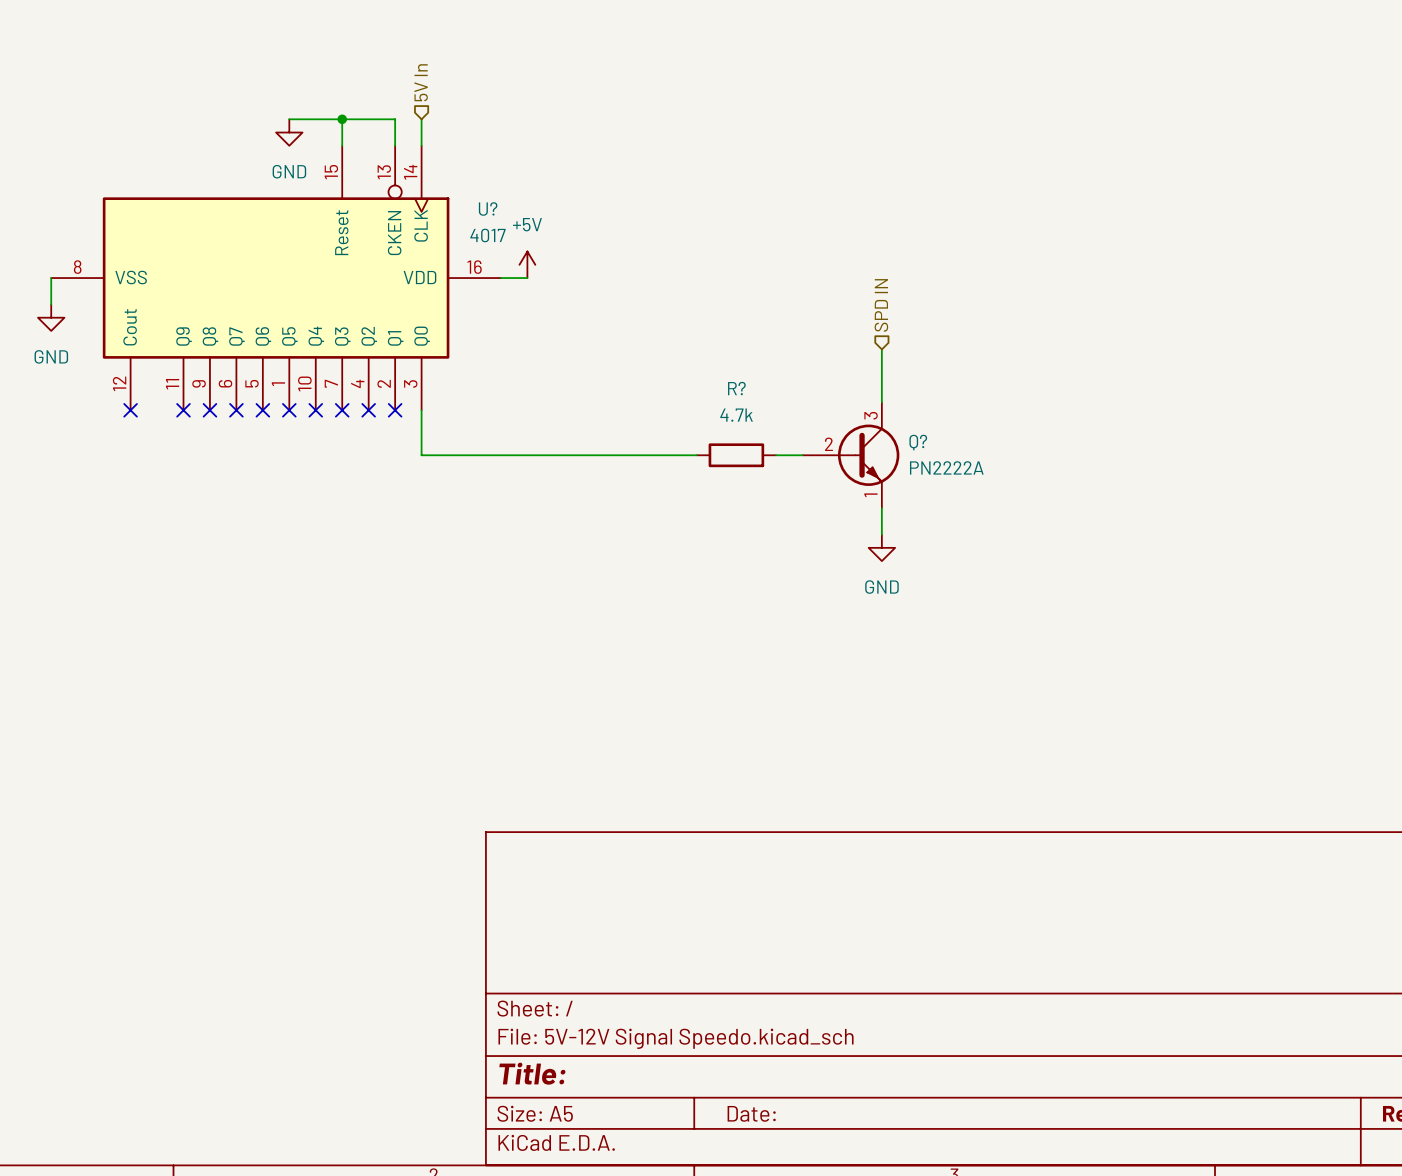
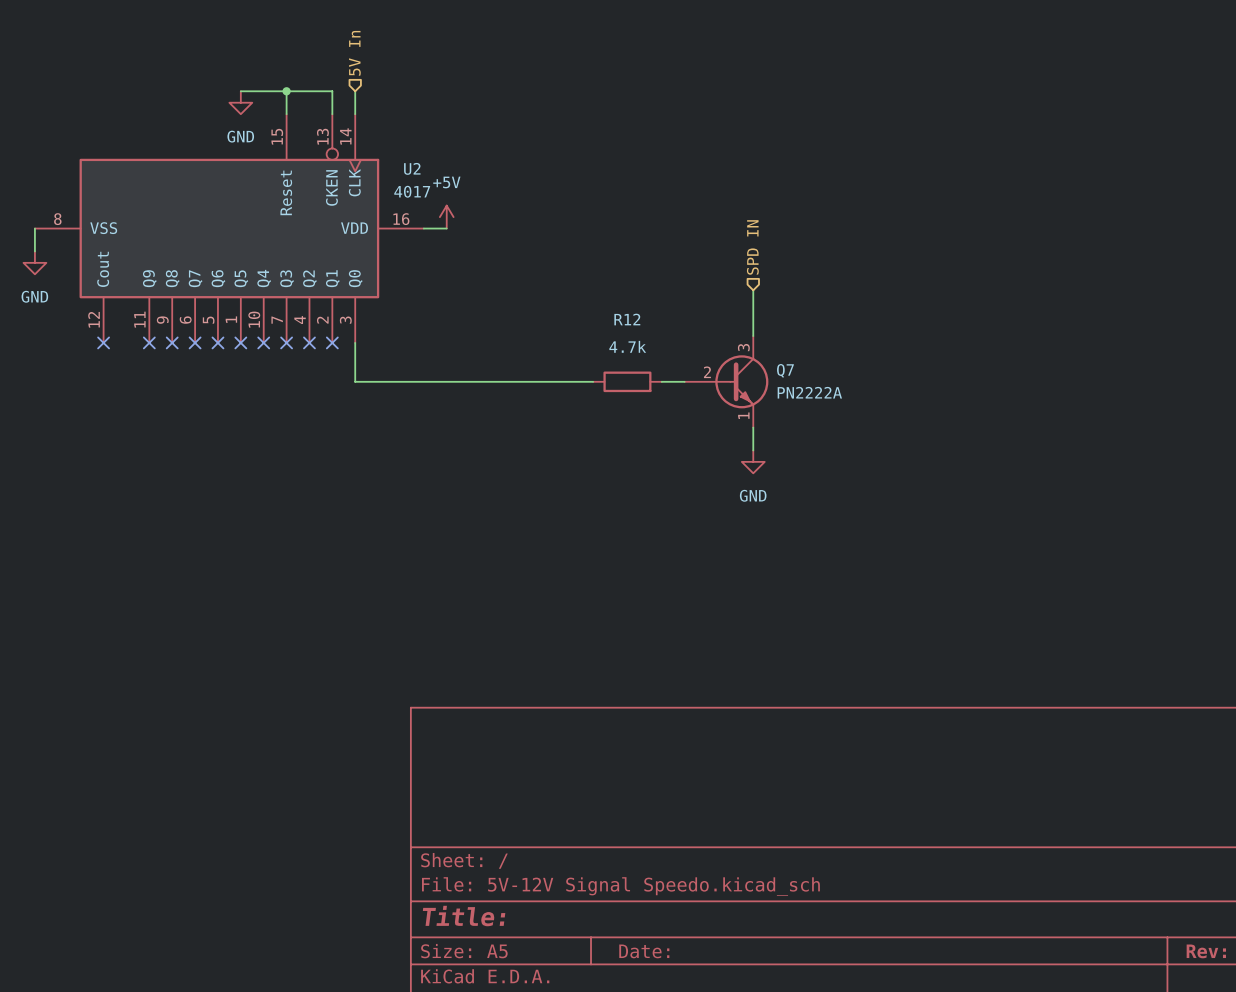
U? name: U? (488, 209) -> U2 (412, 168)
R? name: R? (736, 388) -> R12 (627, 319)
Q? name: Q? (918, 442) -> Q7 (785, 370)

